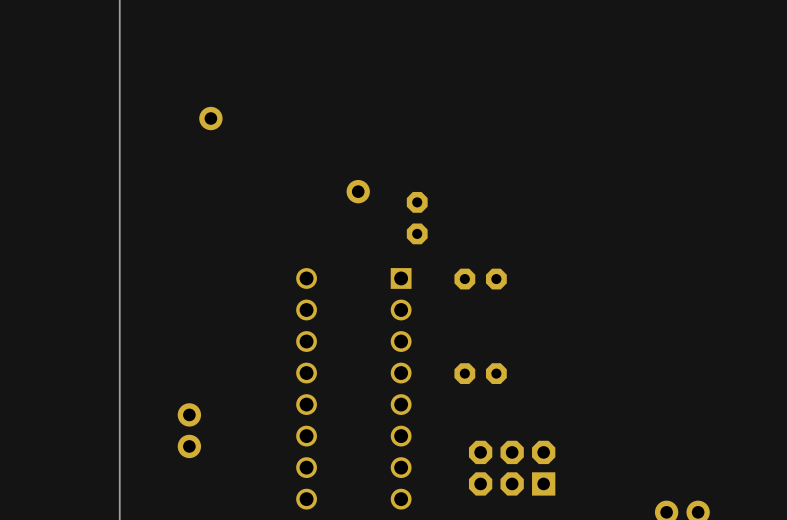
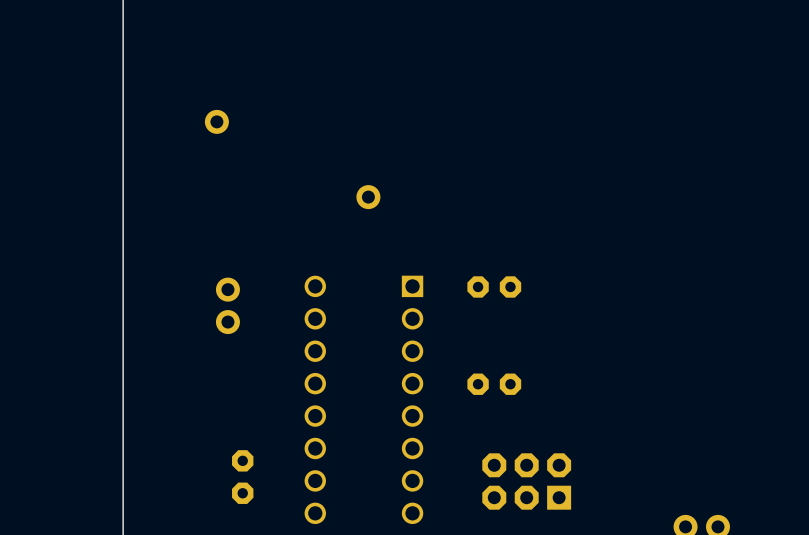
part position: (417, 218) -> (242, 477)
part position: (189, 430) -> (227, 305)

